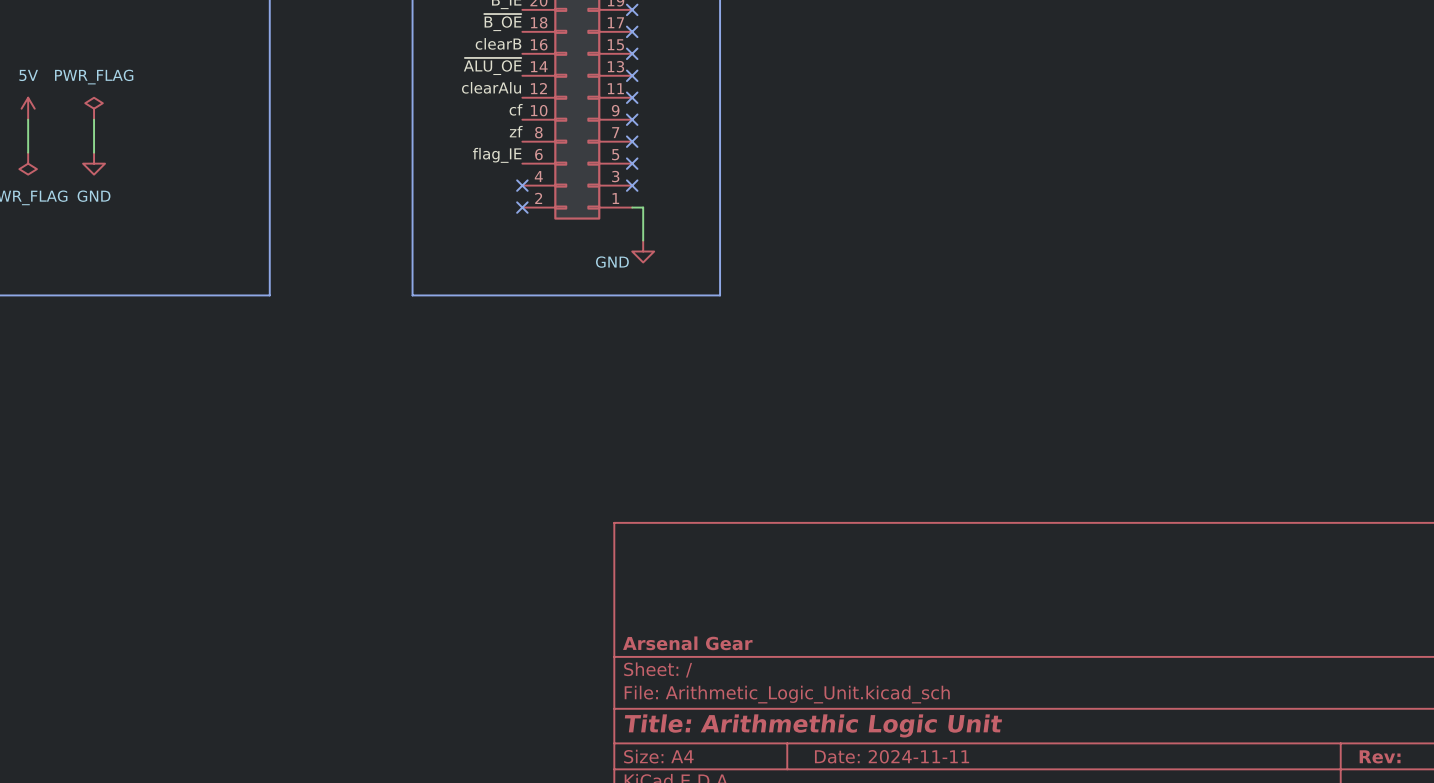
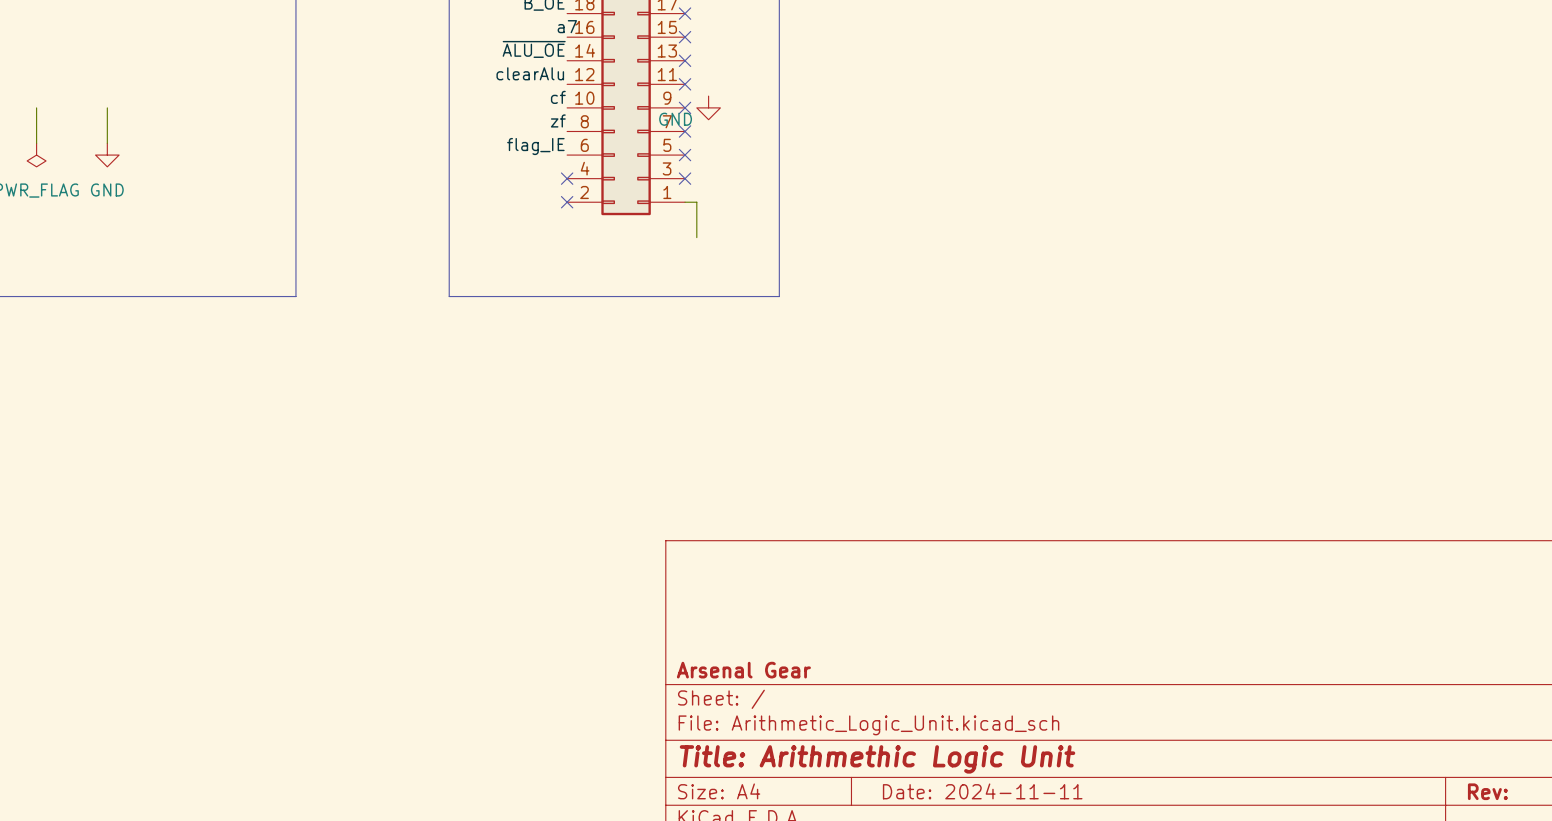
label: clearB (498, 43) -> none
label: none -> a7 (567, 26)
power symbol: 5V (28, 108) -> none
power symbol: PWR_FLAG (94, 108) -> none
power symbol position: GND (643, 251) -> GND (708, 107)

